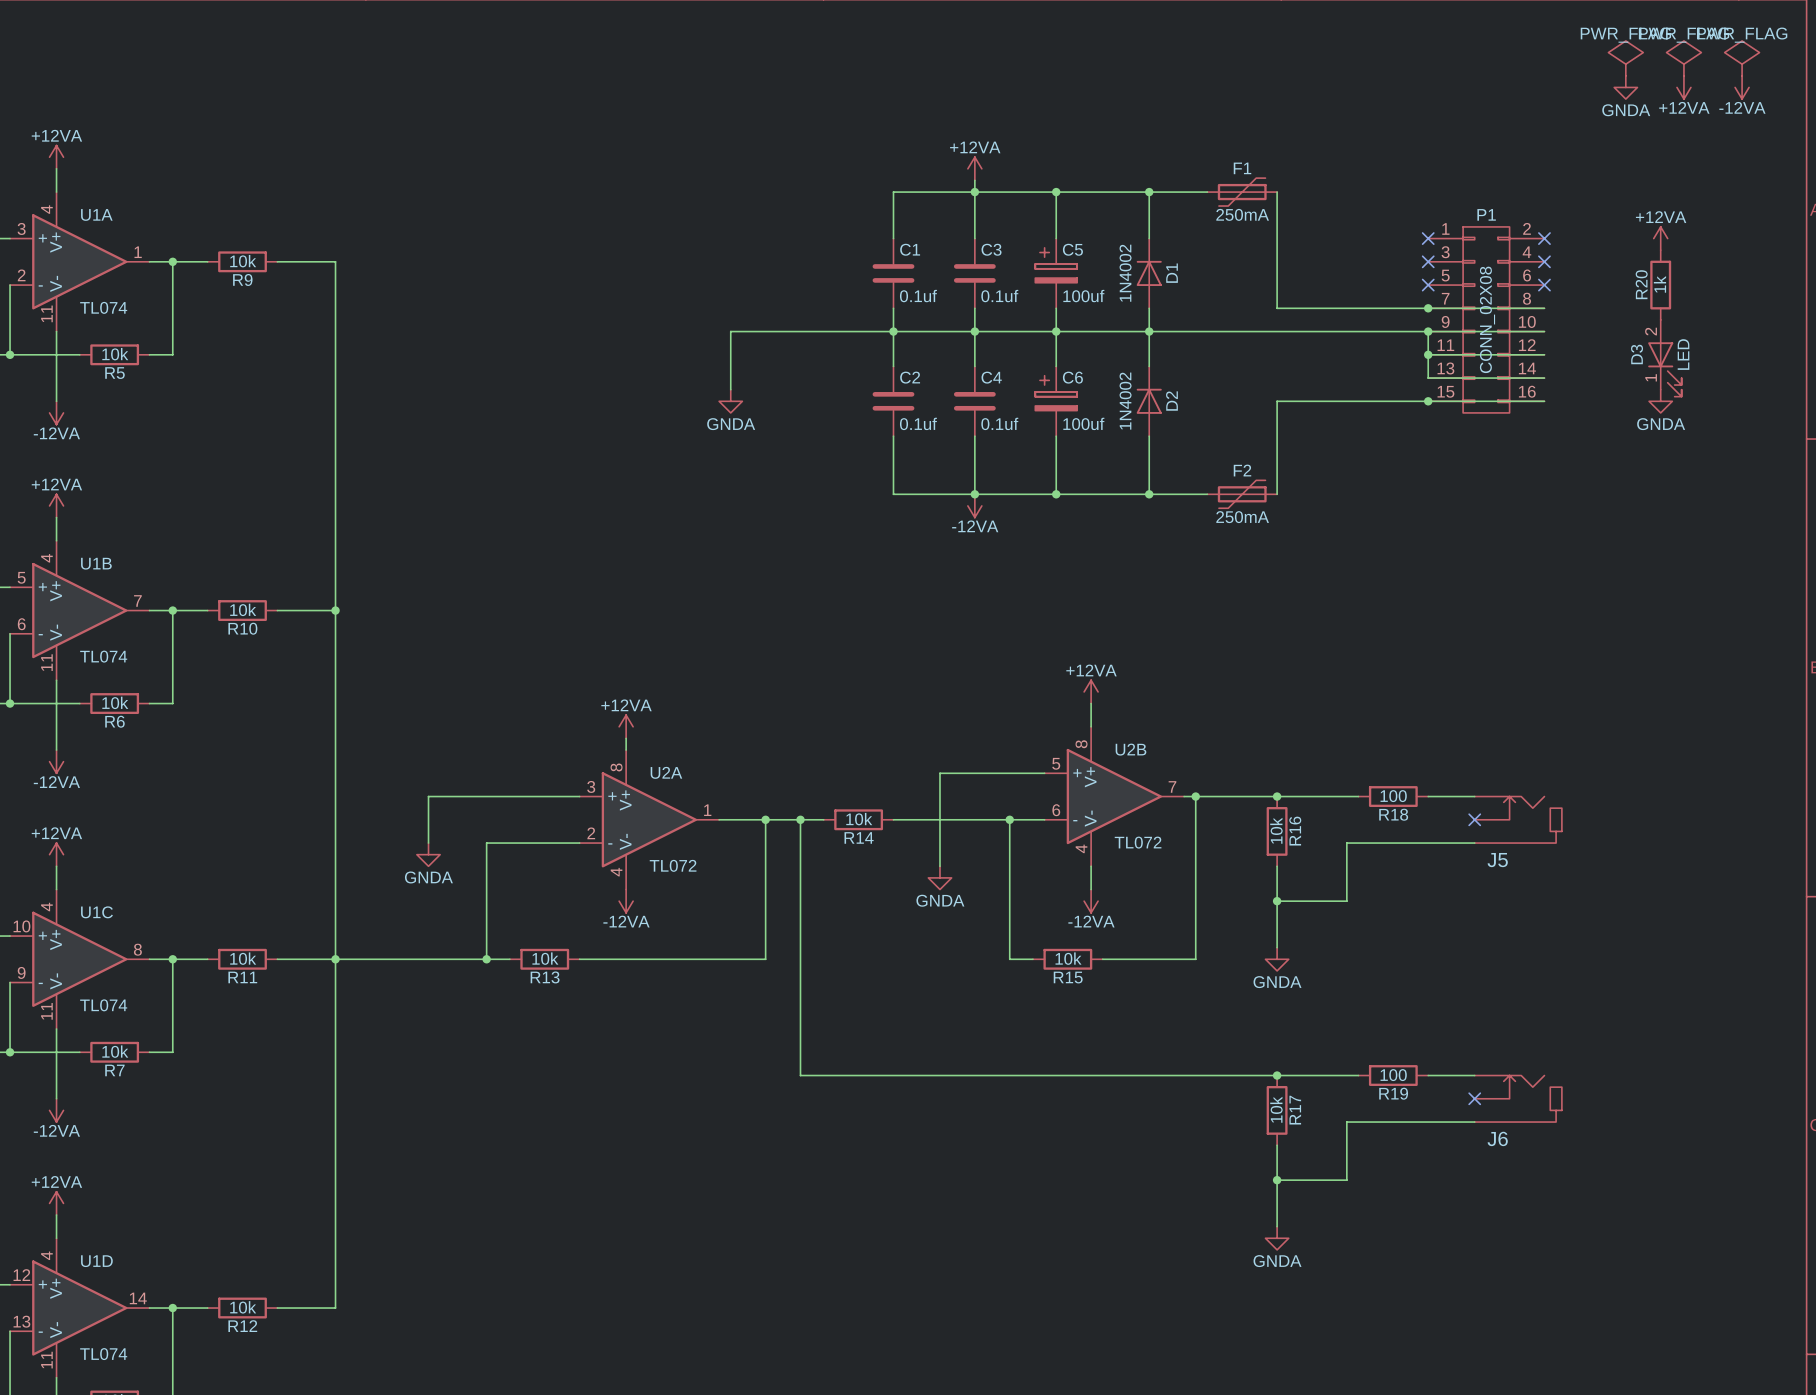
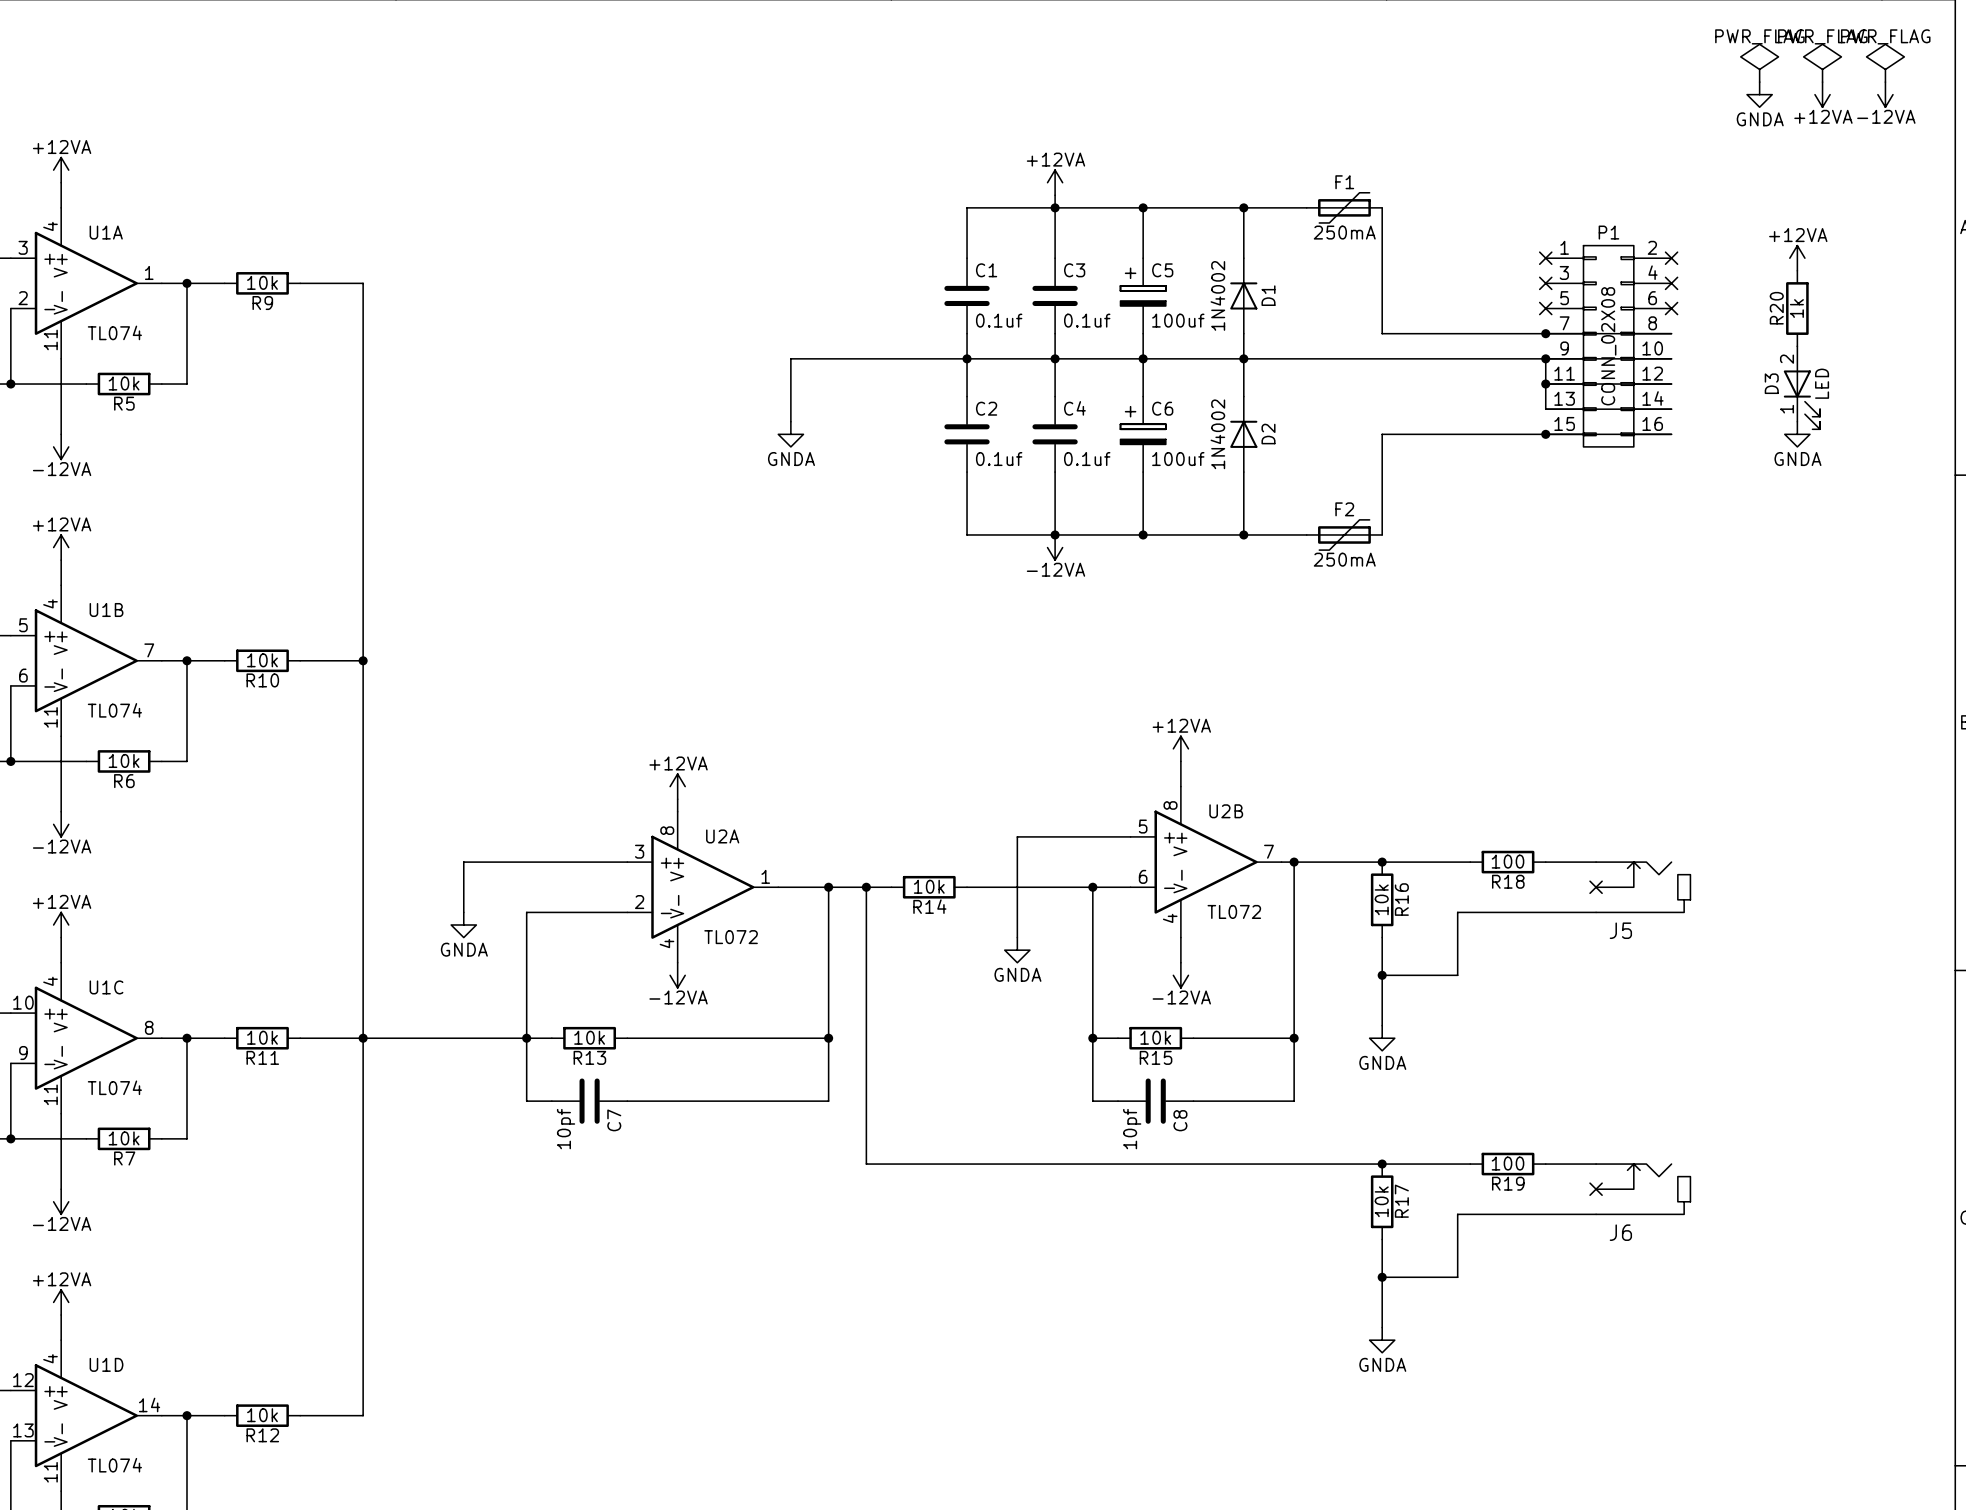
wire: none -> (526, 1038) (526, 1101) (551, 1101)
wire: none -> (828, 1038) (828, 1101) (627, 1101)
junction: none -> (828, 1038)
wire: none -> (1092, 1038) (1092, 1101) (1117, 1101)
junction: none -> (1092, 1038)
wire: none -> (1294, 1038) (1294, 1101) (1193, 1101)
junction: none -> (1294, 1038)
C7: none -> 10pf (589, 1101)
C8: none -> 10pf (1155, 1101)

